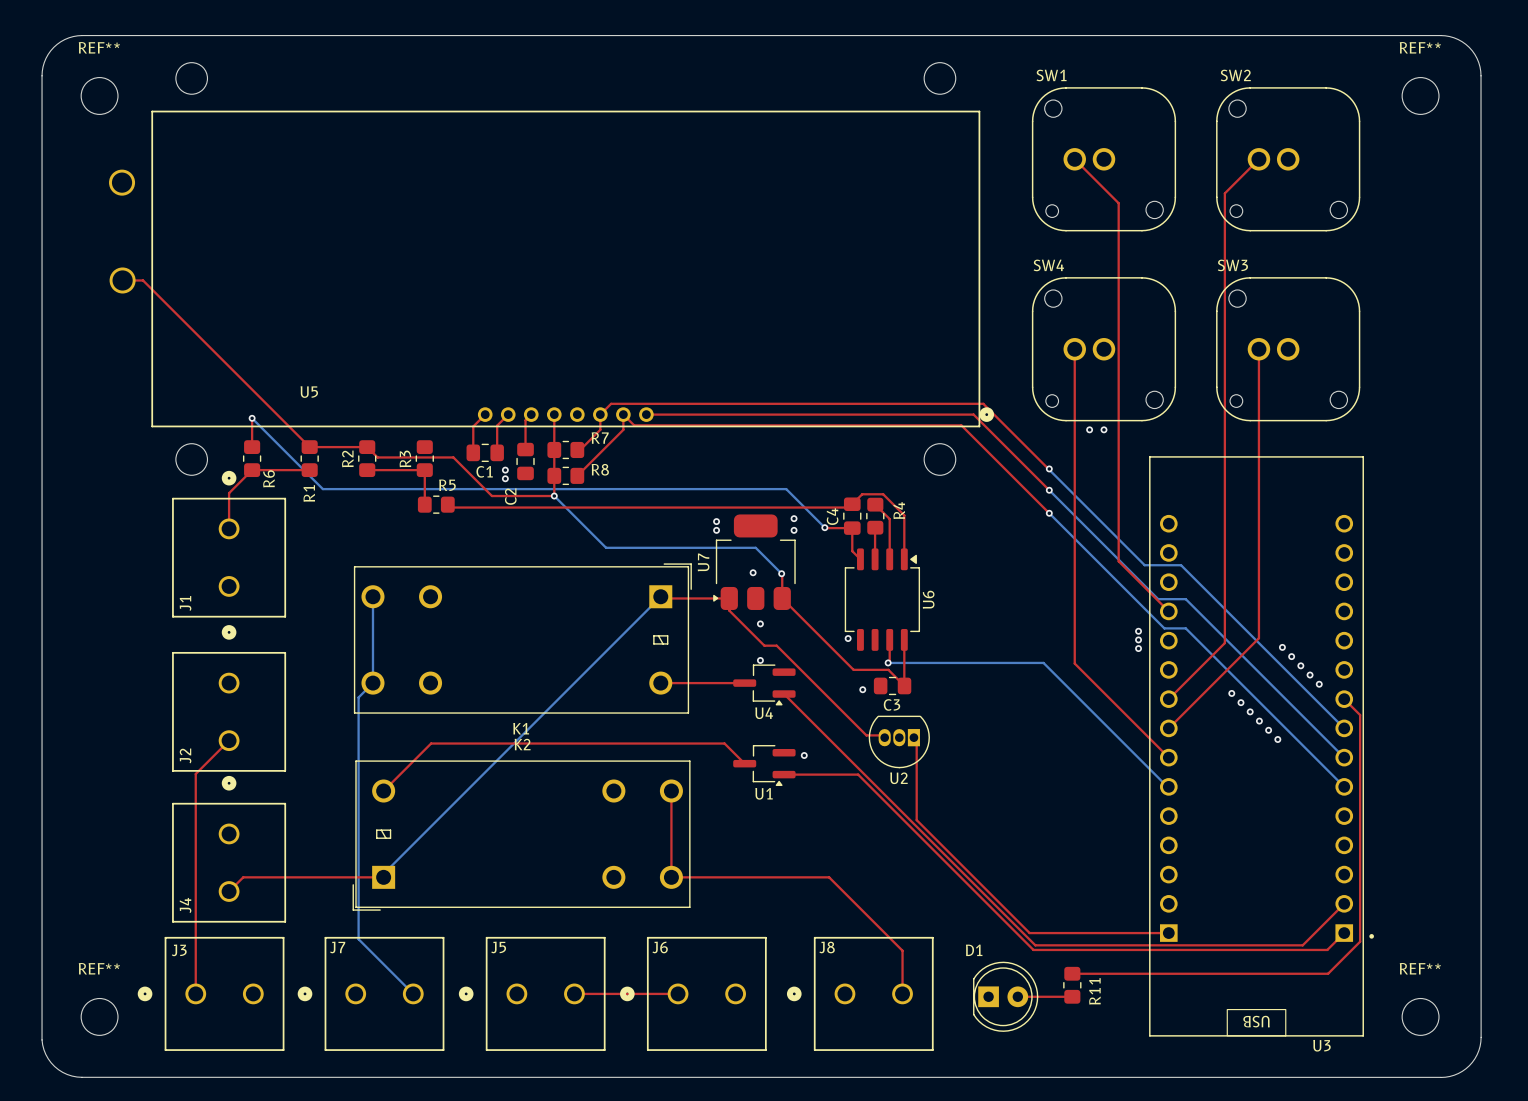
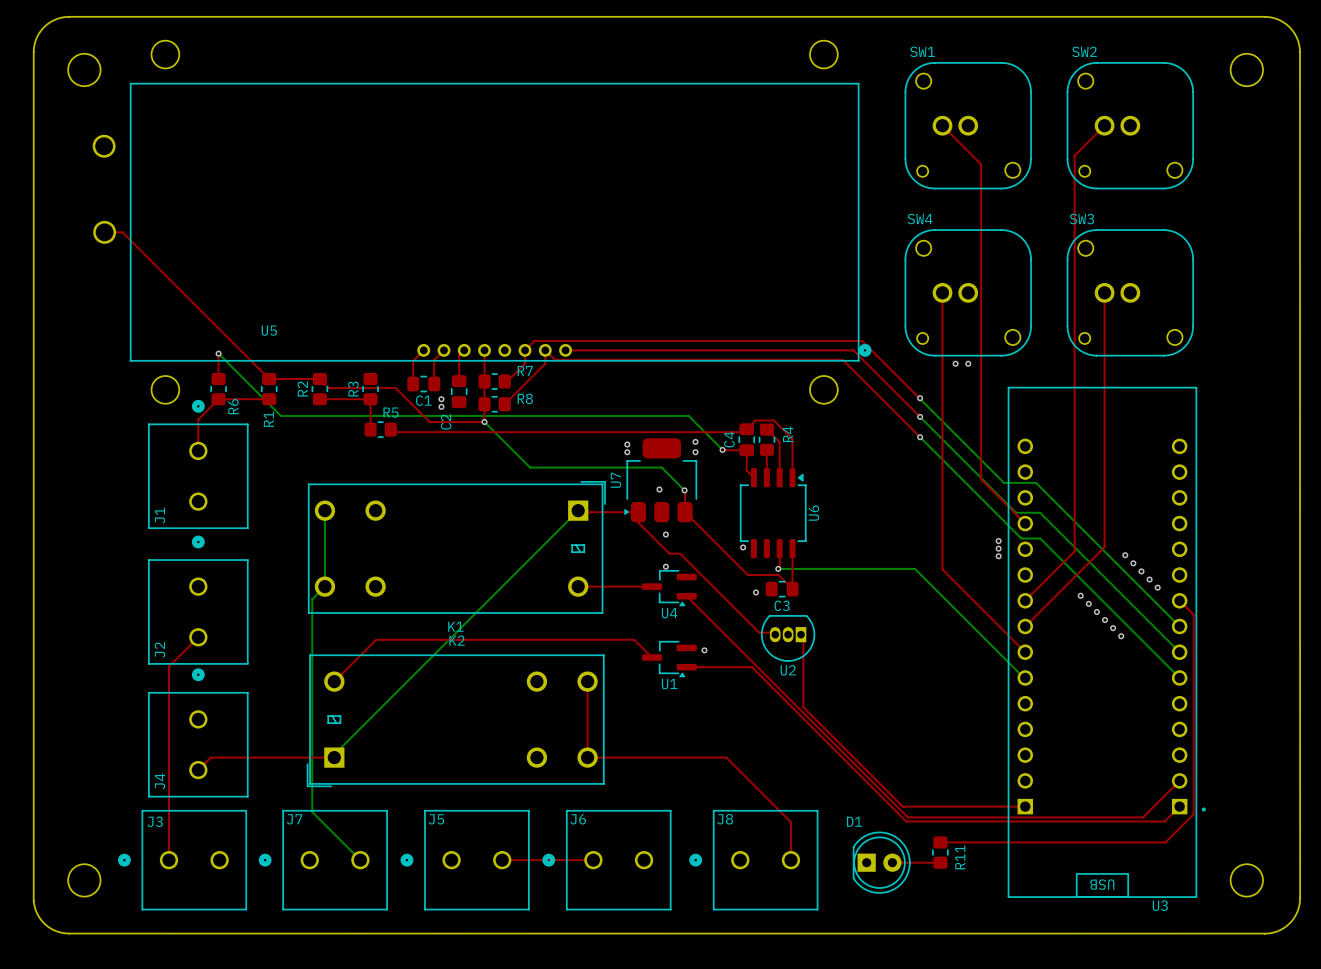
REF** name: REF** (99, 47) -> none
REF** name: REF** (1420, 47) -> none
REF** name: REF** (99, 968) -> none
REF** name: REF** (1420, 968) -> none

